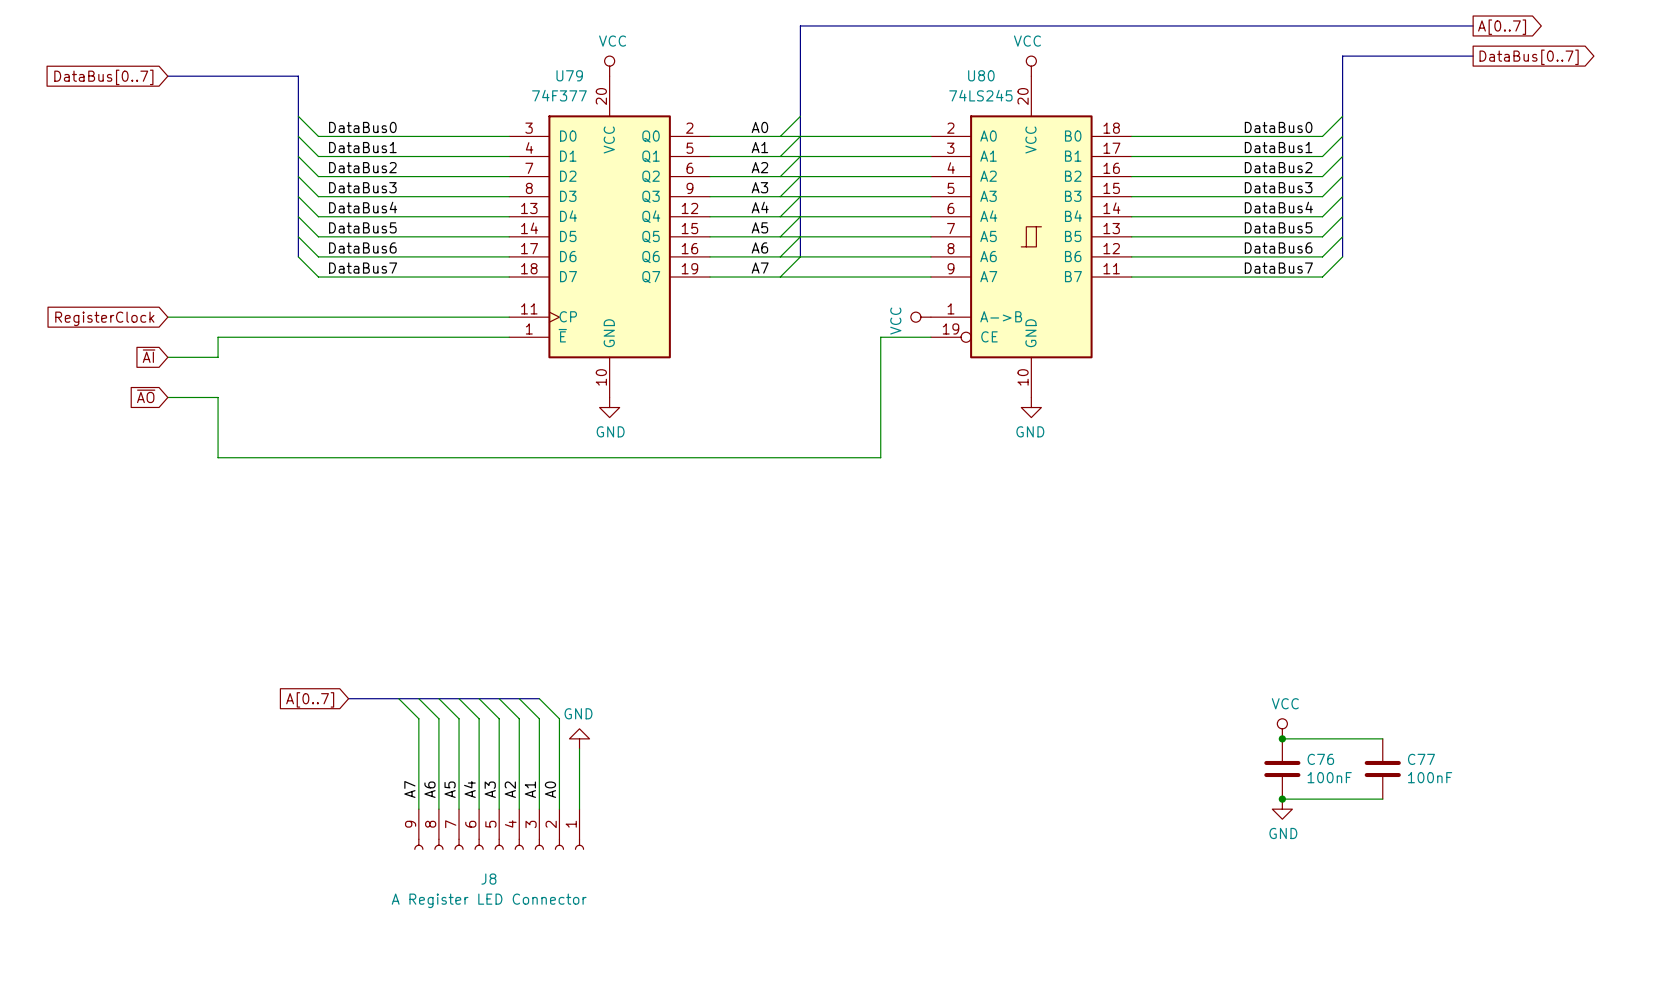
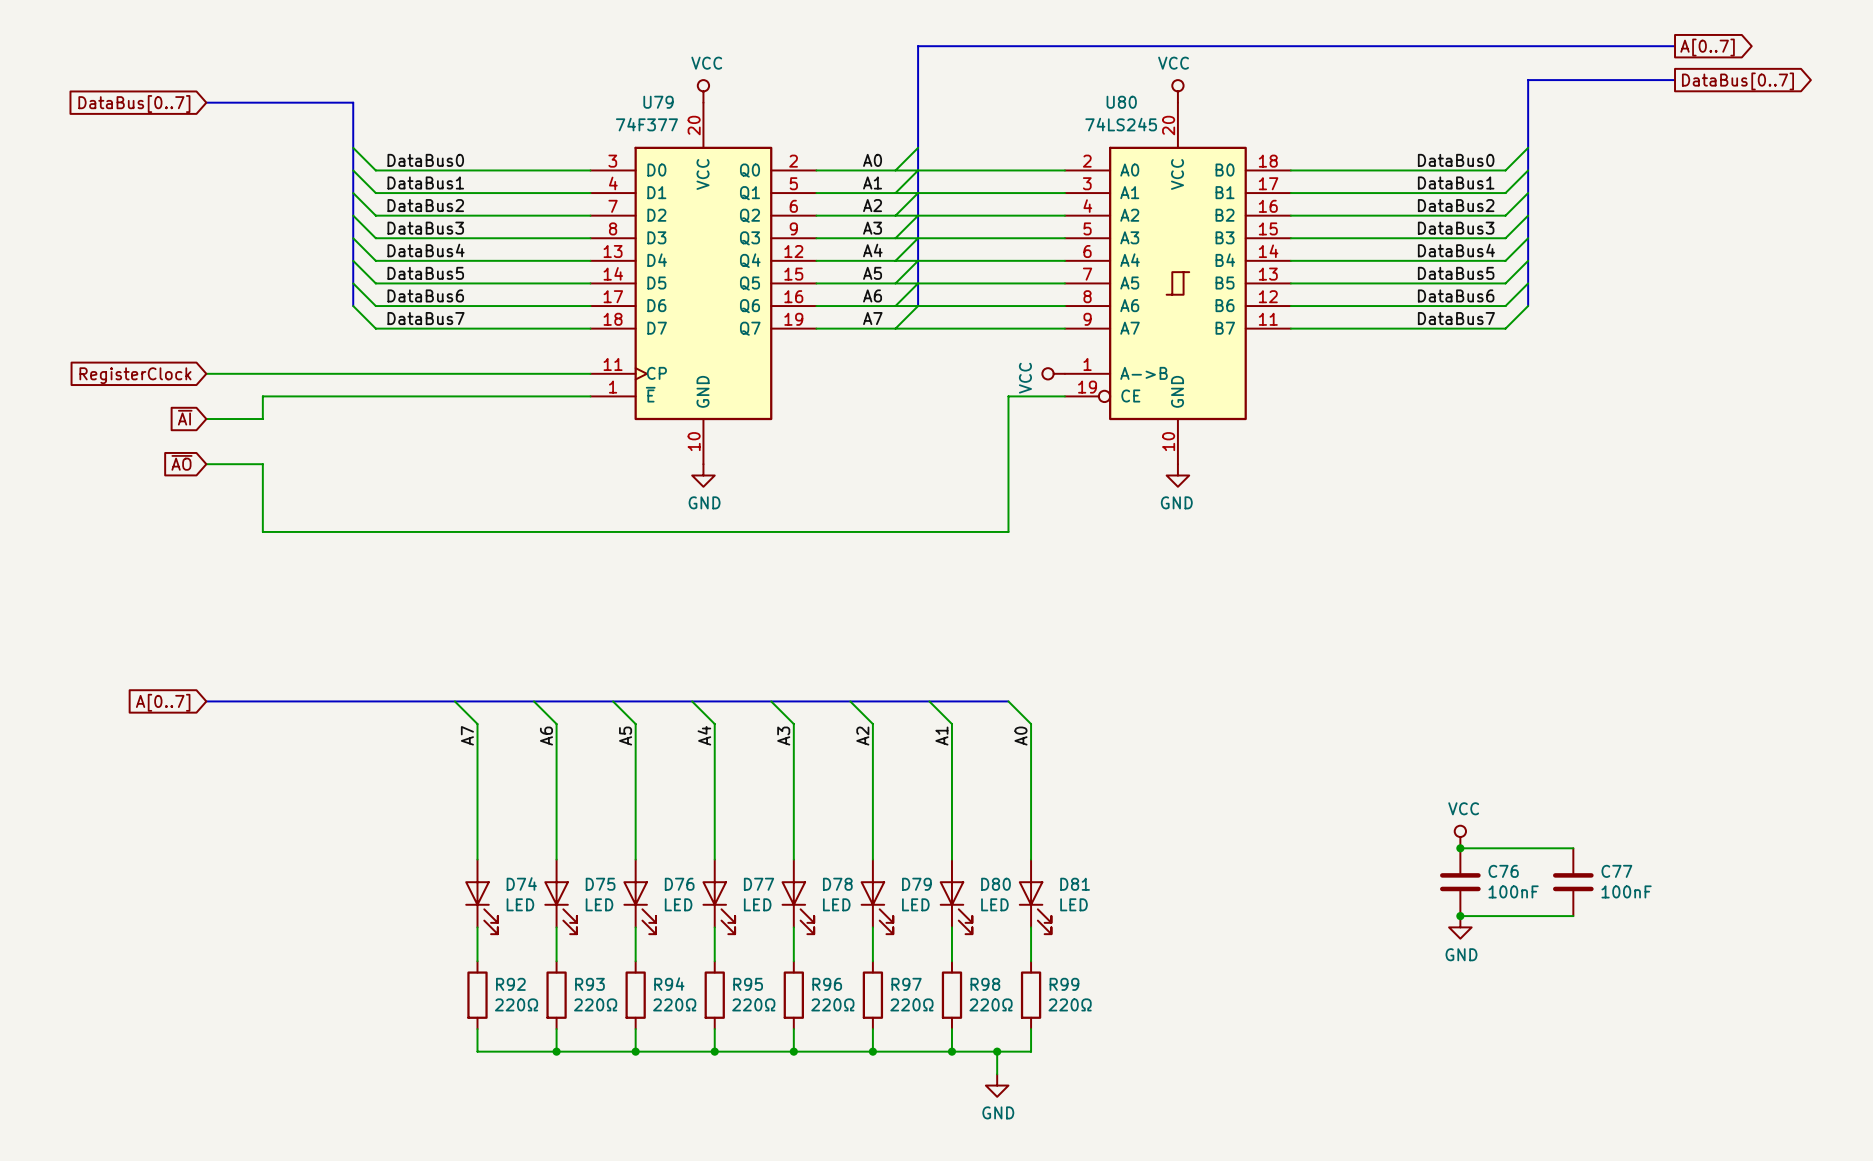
bus: none -> (206, 701) (1008, 701)
wire: none -> (454, 701) (477, 724) (477, 859)
wire: none -> (613, 701) (635, 724) (635, 859)
wire: none -> (692, 701) (714, 724) (714, 859)
wire: none -> (771, 701) (793, 724) (793, 859)
wire: none -> (850, 701) (872, 724) (872, 859)
wire: none -> (929, 701) (951, 724) (951, 859)
wire: none -> (1008, 701) (1031, 724) (1031, 859)
global label: none -> A[0..7] (163, 702)
label: none -> A4 (704, 735)
label: none -> A3 (783, 736)
label: none -> A2 (862, 736)
label: none -> A1 (941, 736)
label: none -> A0 (1020, 736)
bus: (348, 698) (539, 698) -> none
wire: (398, 698) (418, 718) (418, 809) -> none
wire: (418, 698) (438, 718) (438, 809) -> none
wire: (438, 698) (459, 718) (459, 809) -> none
wire: (459, 698) (479, 718) -> (533, 701) (556, 724) (556, 825)
wire: (479, 698) (499, 718) (499, 809) -> none
wire: (499, 698) (519, 718) (519, 809) -> none
wire: (519, 698) (539, 718) (539, 809) -> none
wire: (539, 698) (559, 718) (559, 809) -> none
global label: A[0..7] (310, 699) -> none
power symbol: GND (579, 738) -> none
wire: (579, 748) (579, 809) -> none
D74: none -> LED (481, 896)
D75: none -> LED (560, 896)
D76: none -> LED (639, 896)
D77: none -> LED (718, 896)
D78: none -> LED (797, 896)
D79: none -> LED (876, 896)
D80: none -> LED (956, 896)
D81: none -> LED (1035, 896)
label position: A7 (409, 789) -> A7 (467, 735)
label position: A6 (429, 789) -> A6 (546, 736)
label position: A5 (450, 789) -> A5 (625, 736)
label: A4 (469, 789) -> none
label: A3 (490, 789) -> none
label: A2 (510, 789) -> none
label: A1 (530, 789) -> none
label: A0 (550, 789) -> none
wire: none -> (477, 927) (477, 961)
wire: none -> (635, 927) (635, 961)
wire: none -> (714, 927) (714, 961)
wire: none -> (793, 927) (793, 961)
wire: none -> (872, 927) (872, 961)
wire: none -> (951, 927) (951, 961)
wire: none -> (1031, 927) (1031, 961)
J8: A Register LED Connector (499, 829) -> none
R92: none -> 220Ω (477, 995)
R93: none -> 220Ω (556, 995)
R94: none -> 220Ω (635, 995)
R95: none -> 220Ω (714, 995)
R96: none -> 220Ω (793, 995)
R97: none -> 220Ω (872, 995)
R98: none -> 220Ω (951, 995)
R99: none -> 220Ω (1031, 995)
wire: none -> (477, 1029) (477, 1051) (1031, 1051) (1031, 1029)
wire: none -> (556, 1029) (556, 1051)
wire: none -> (635, 1029) (635, 1051)
wire: none -> (714, 1029) (714, 1051)
wire: none -> (793, 1029) (793, 1051)
wire: none -> (872, 1029) (872, 1051)
wire: none -> (951, 1029) (951, 1051)
junction: none -> (556, 1051)
junction: none -> (635, 1051)
junction: none -> (714, 1051)
junction: none -> (793, 1051)
junction: none -> (872, 1051)
junction: none -> (951, 1051)
wire: none -> (997, 1051) (997, 1074)
junction: none -> (997, 1051)
power symbol: none -> GND (997, 1085)

